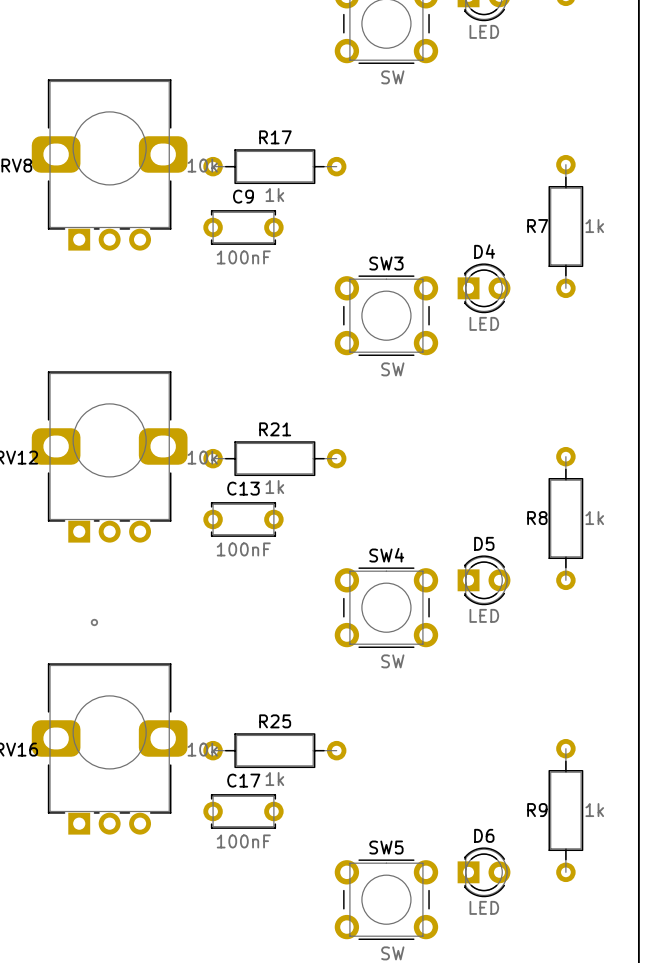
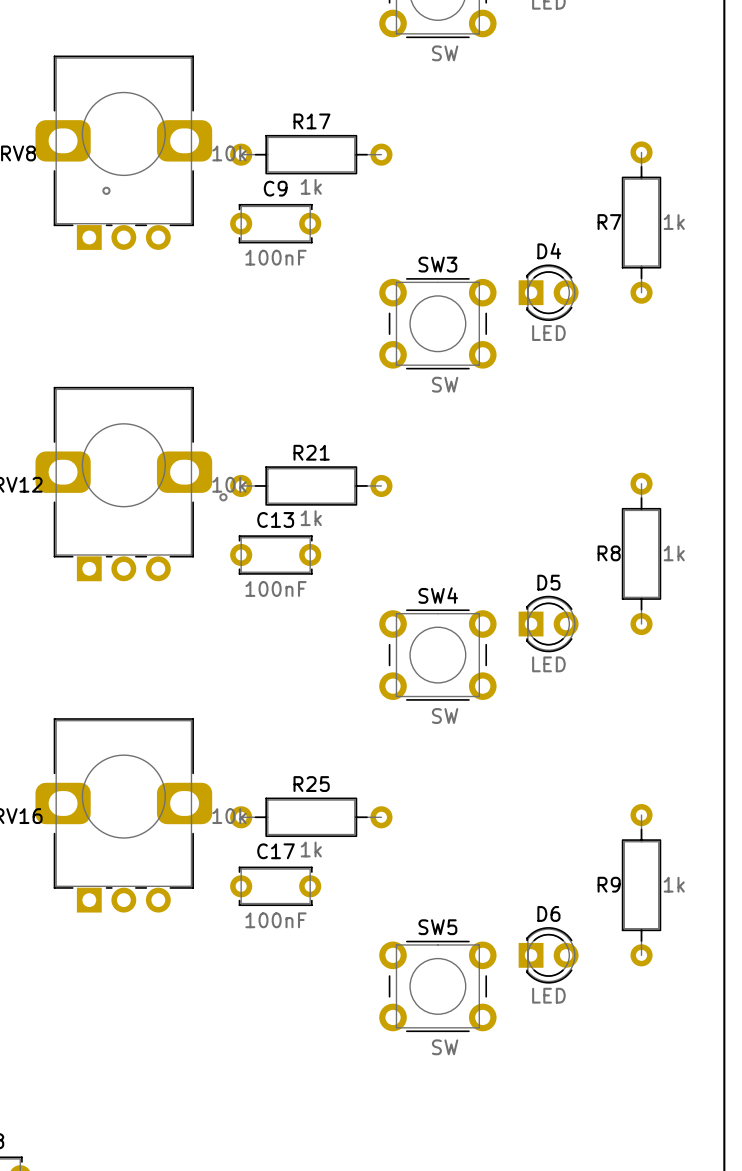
via: none -> (106, 190)
via: none -> (223, 497)
via: (94, 622) -> none

